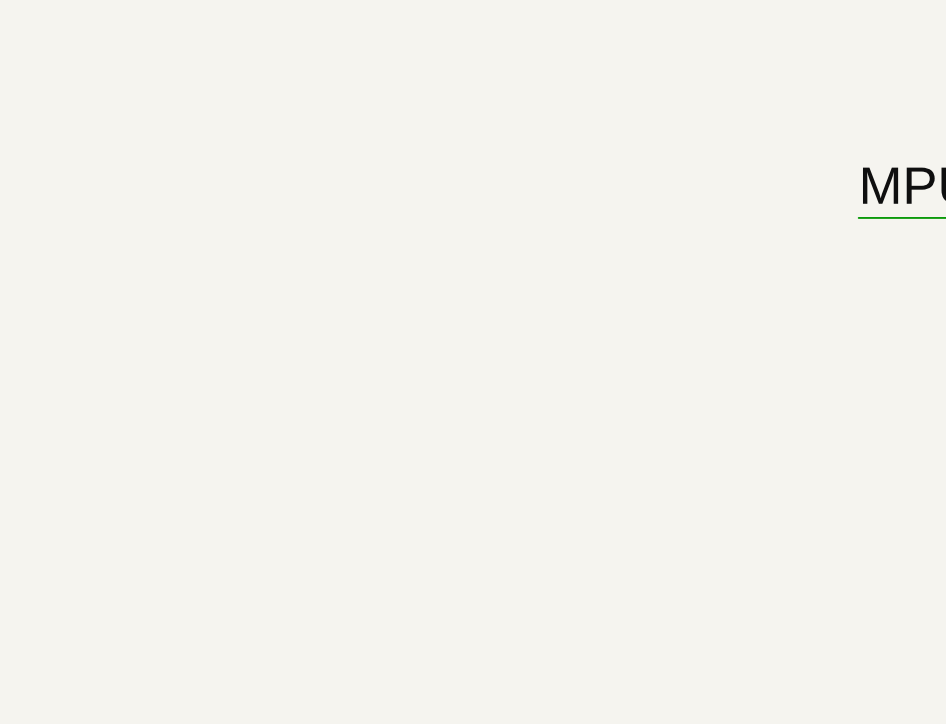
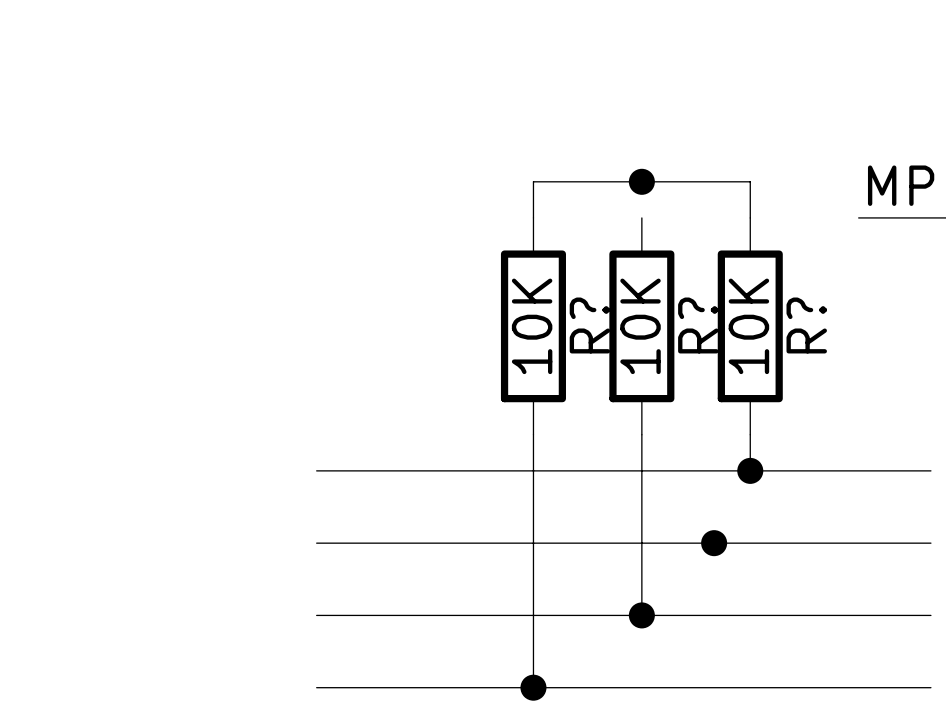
junction: none -> (641, 181)
wire: none -> (533, 217) (533, 181) (750, 181) (750, 217)
R?: none -> 10K (533, 326)
R?: none -> 10K (641, 326)
R?: none -> 10K (750, 326)
wire: none -> (533, 434) (533, 687)
wire: none -> (641, 434) (641, 615)
wire: none -> (750, 434) (750, 470)
wire: none -> (316, 470) (930, 470)
junction: none -> (750, 470)
wire: none -> (316, 543) (930, 543)
junction: none -> (714, 543)
wire: none -> (316, 615) (930, 615)
junction: none -> (641, 615)
wire: none -> (316, 687) (930, 687)
junction: none -> (533, 687)

